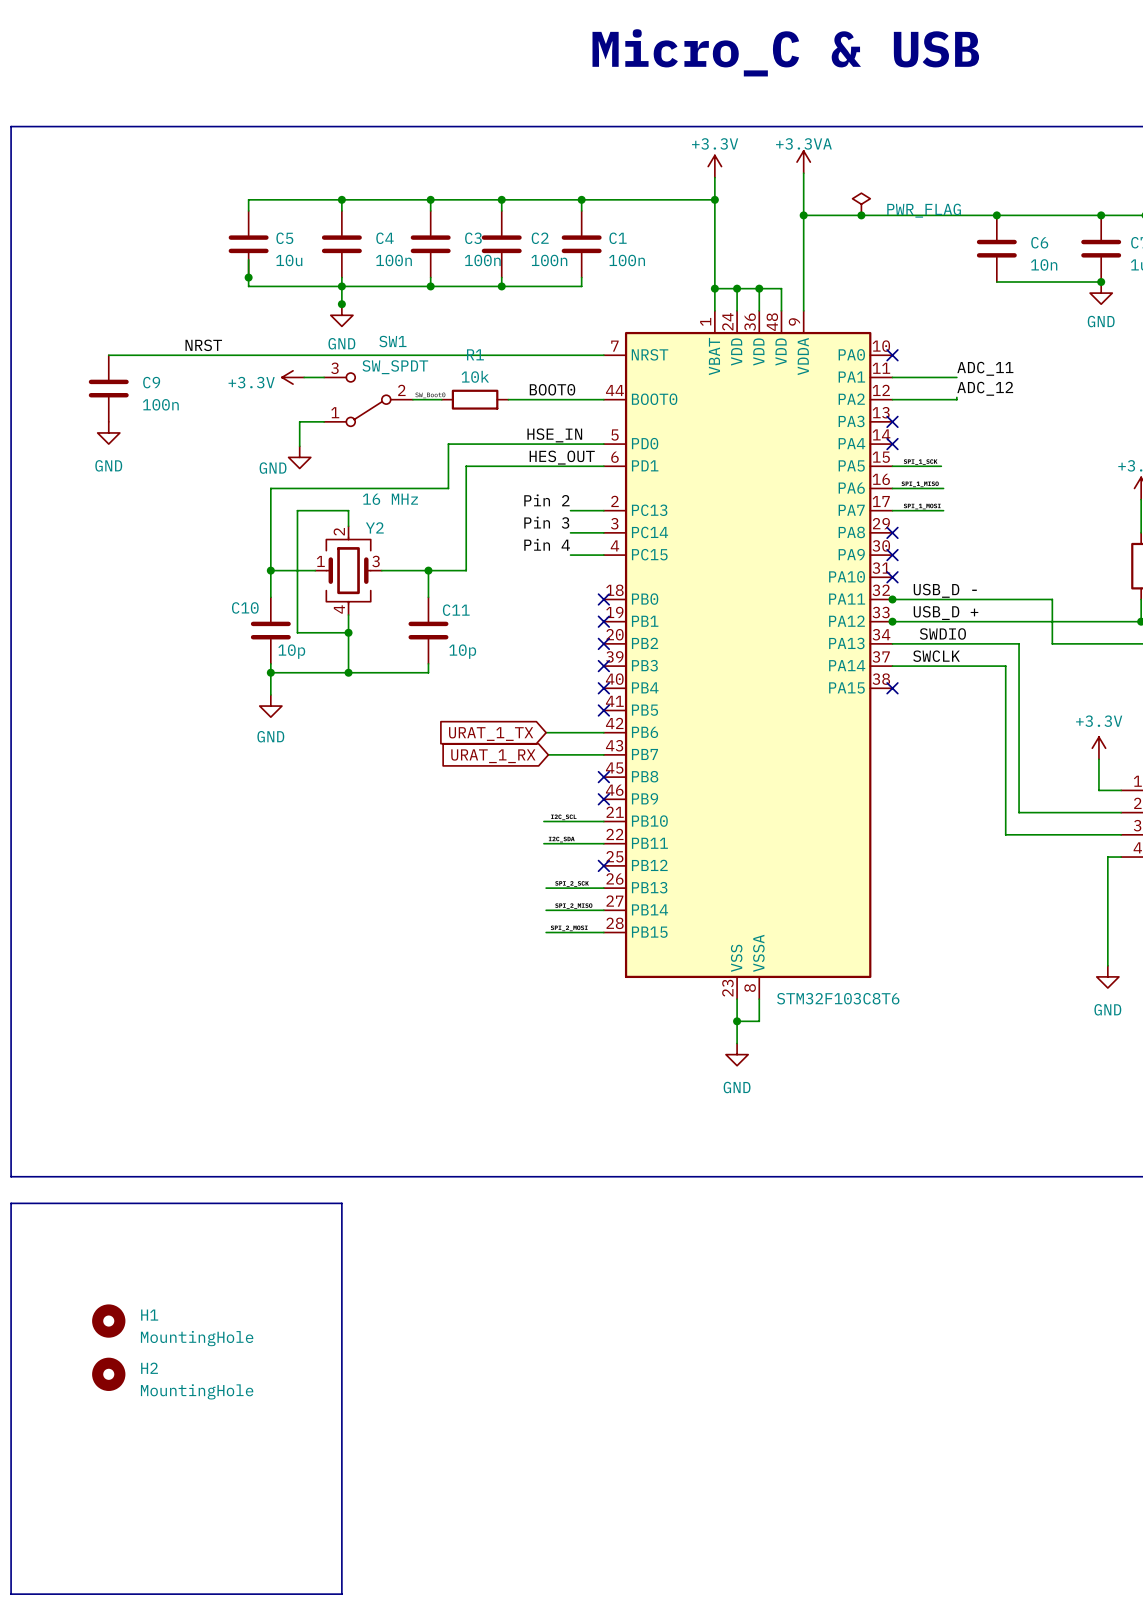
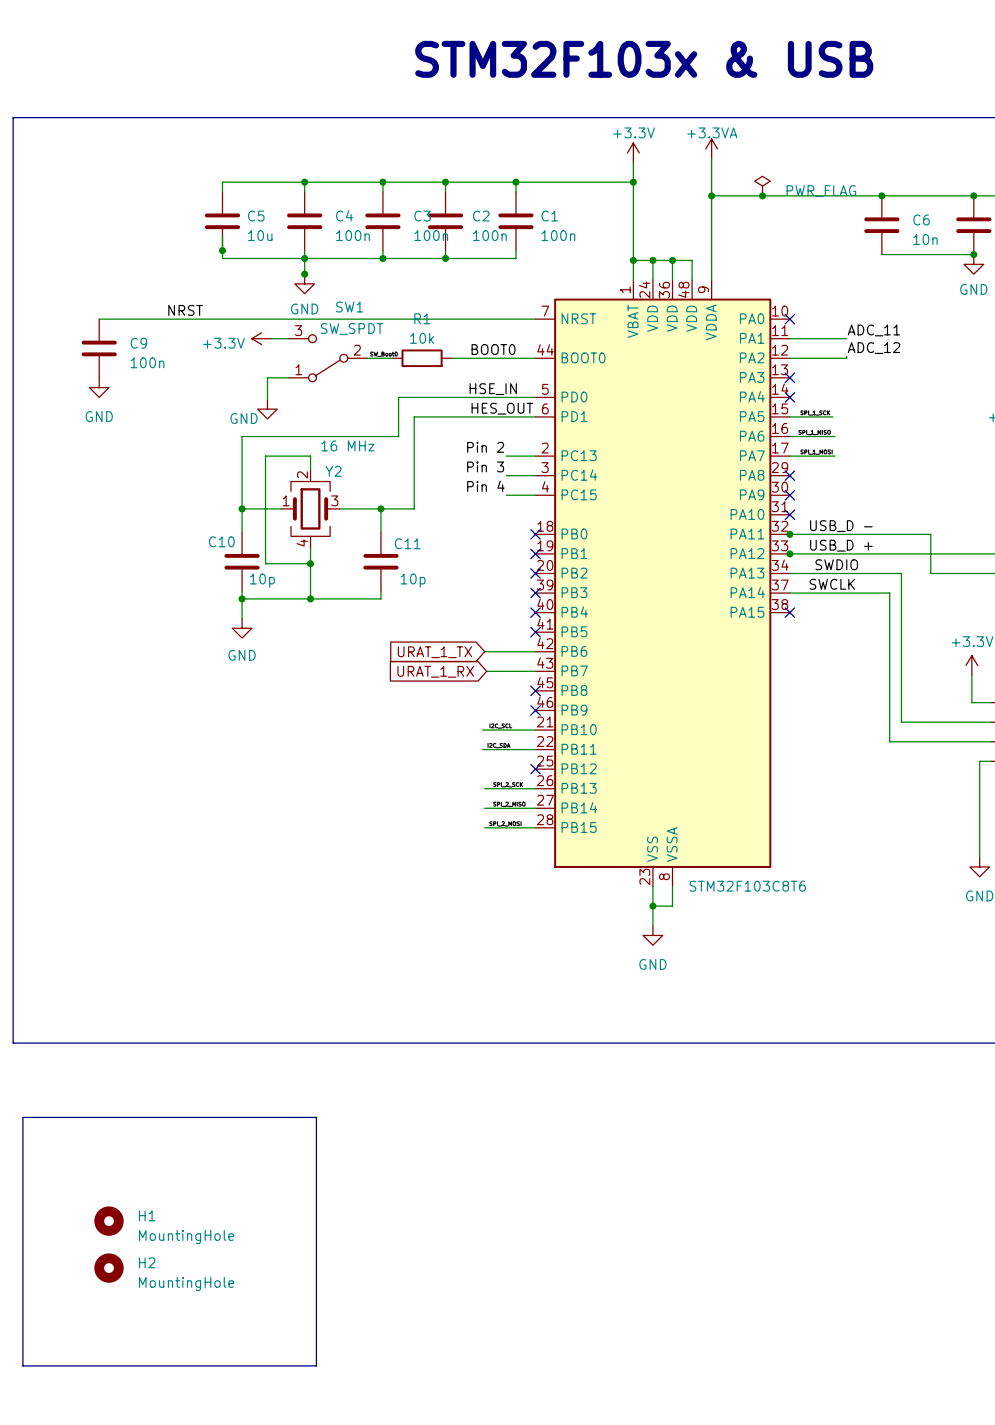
text: Micro_C & USB (785, 52) -> none
text: none -> STM32F103x & USB (644, 59)
line: (11, 1203) (341, 1203) (341, 1594) (11, 1594) (11, 1203) -> (22, 1117) (22, 1365) (316, 1365) (316, 1117) (22, 1117)
H1 position: (108, 1321) -> (109, 1221)
H2 position: (108, 1374) -> (109, 1268)

